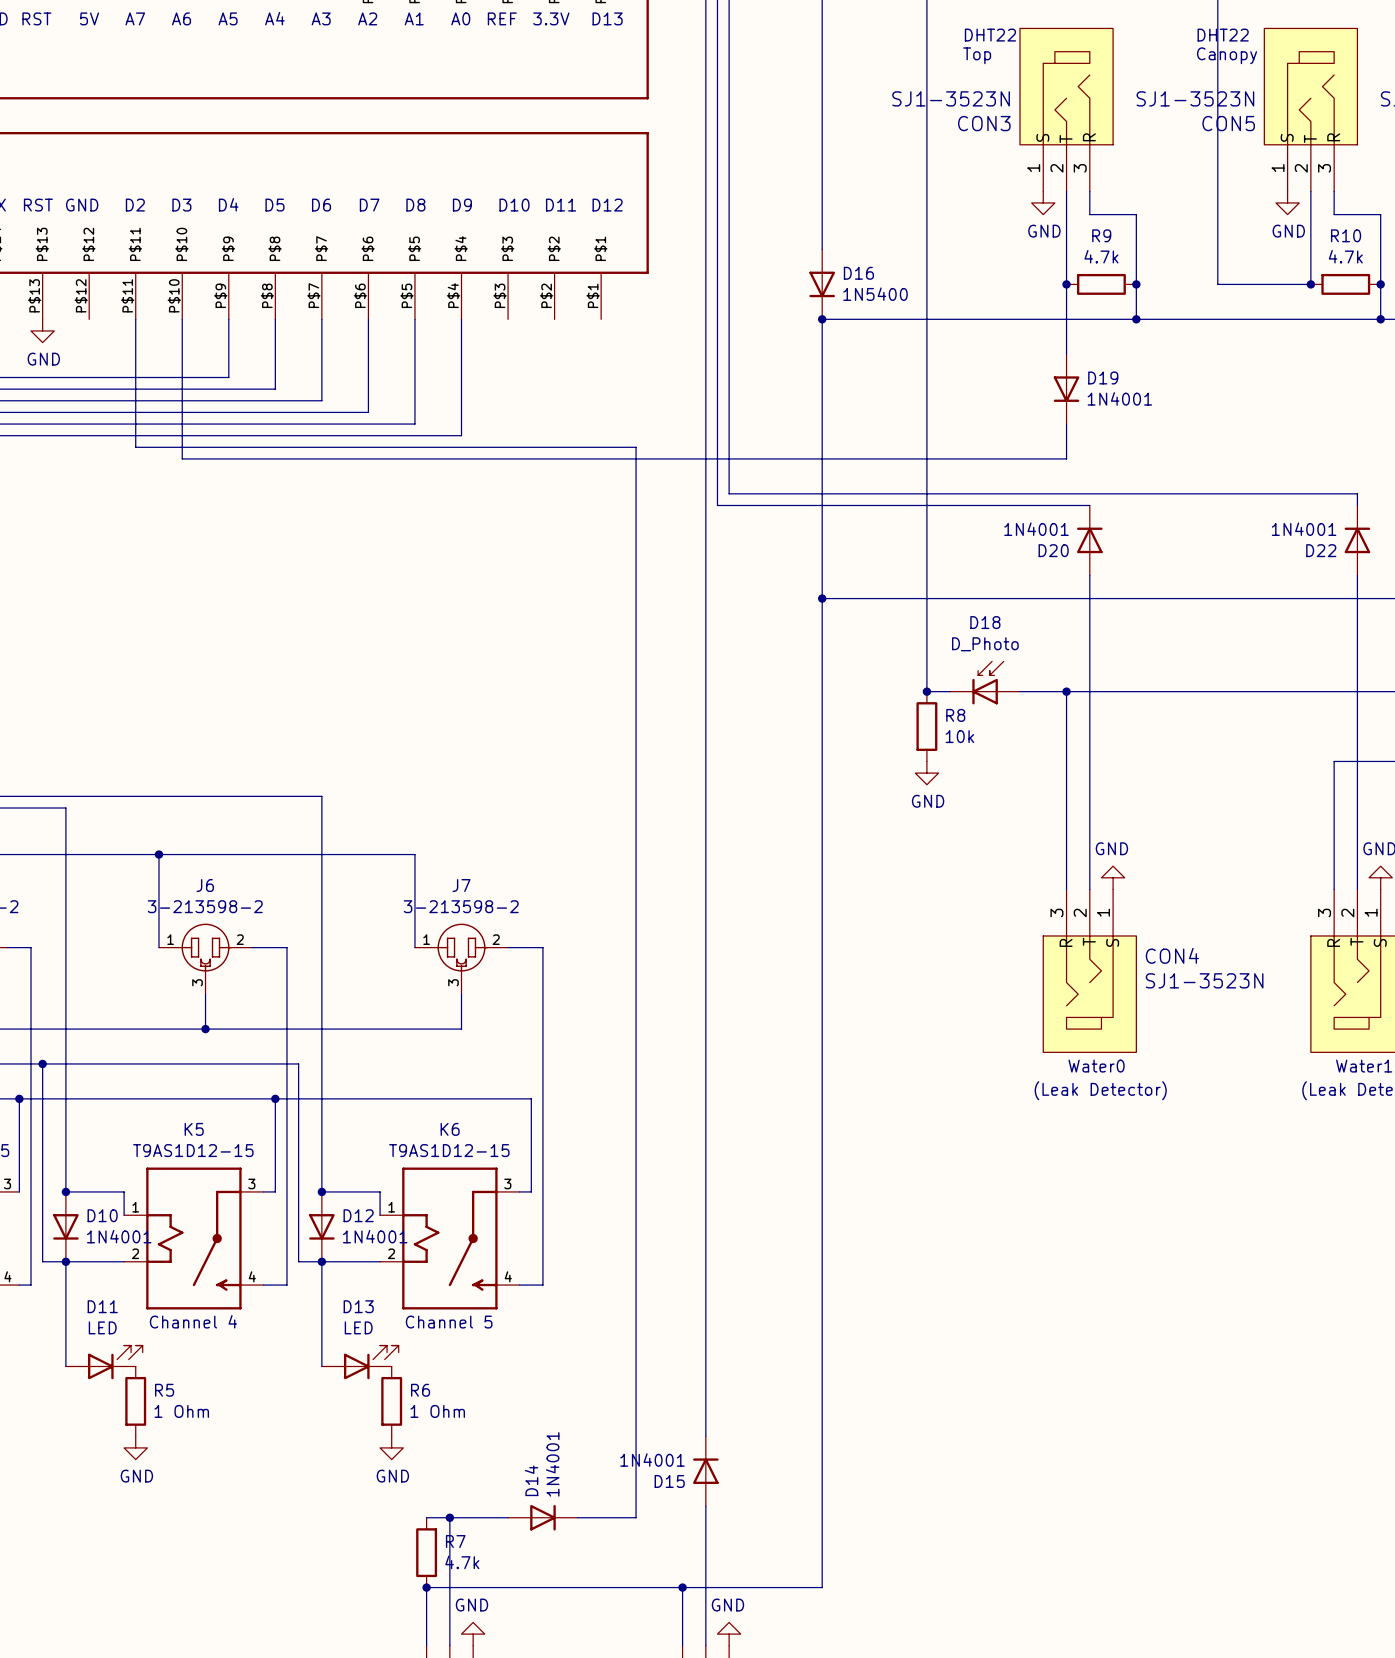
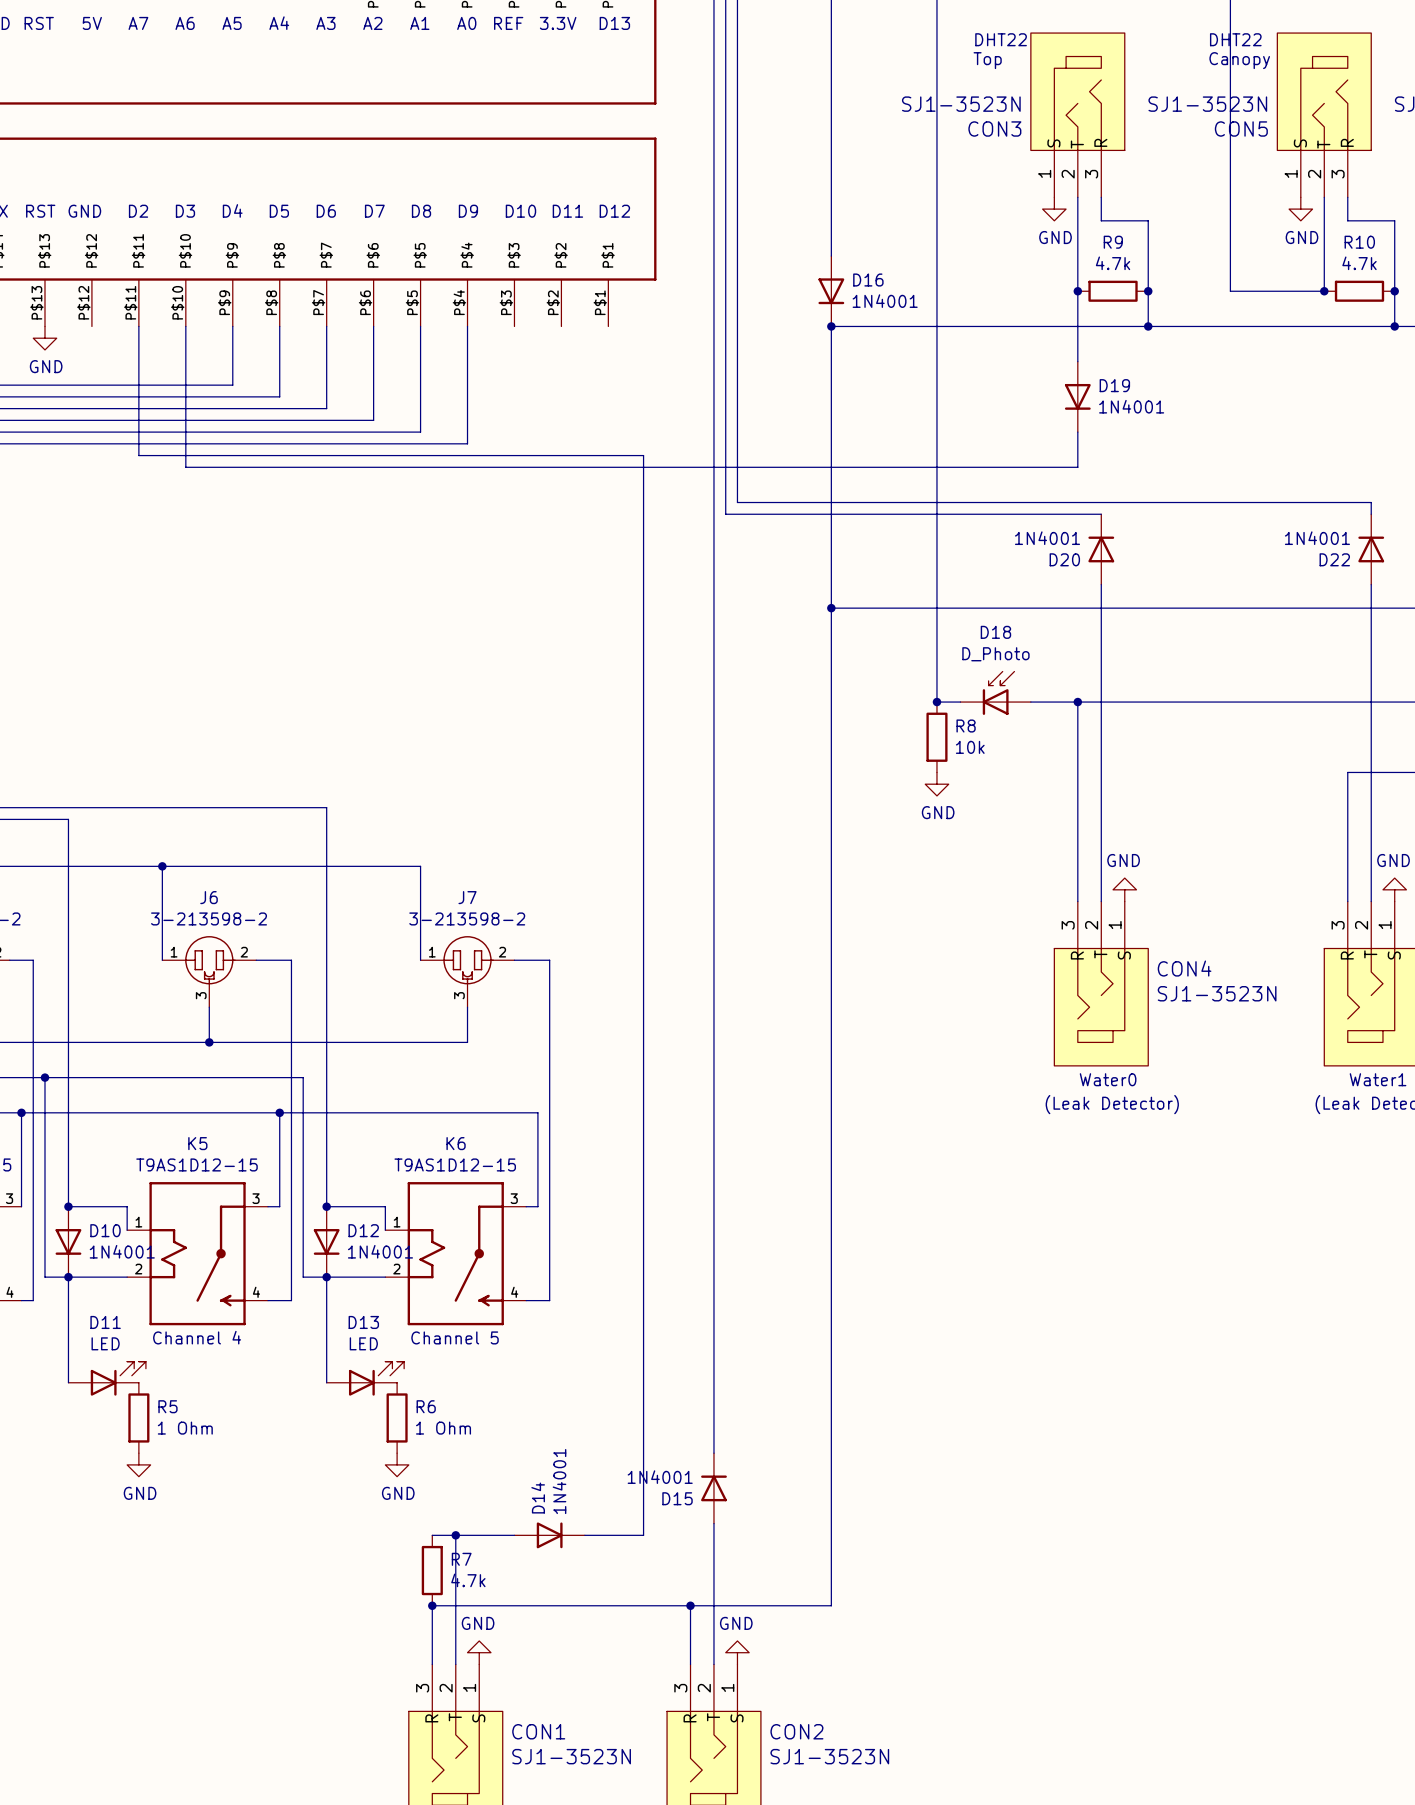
D16 value: 1N5400 (875, 294) -> 1N4001 (885, 301)

